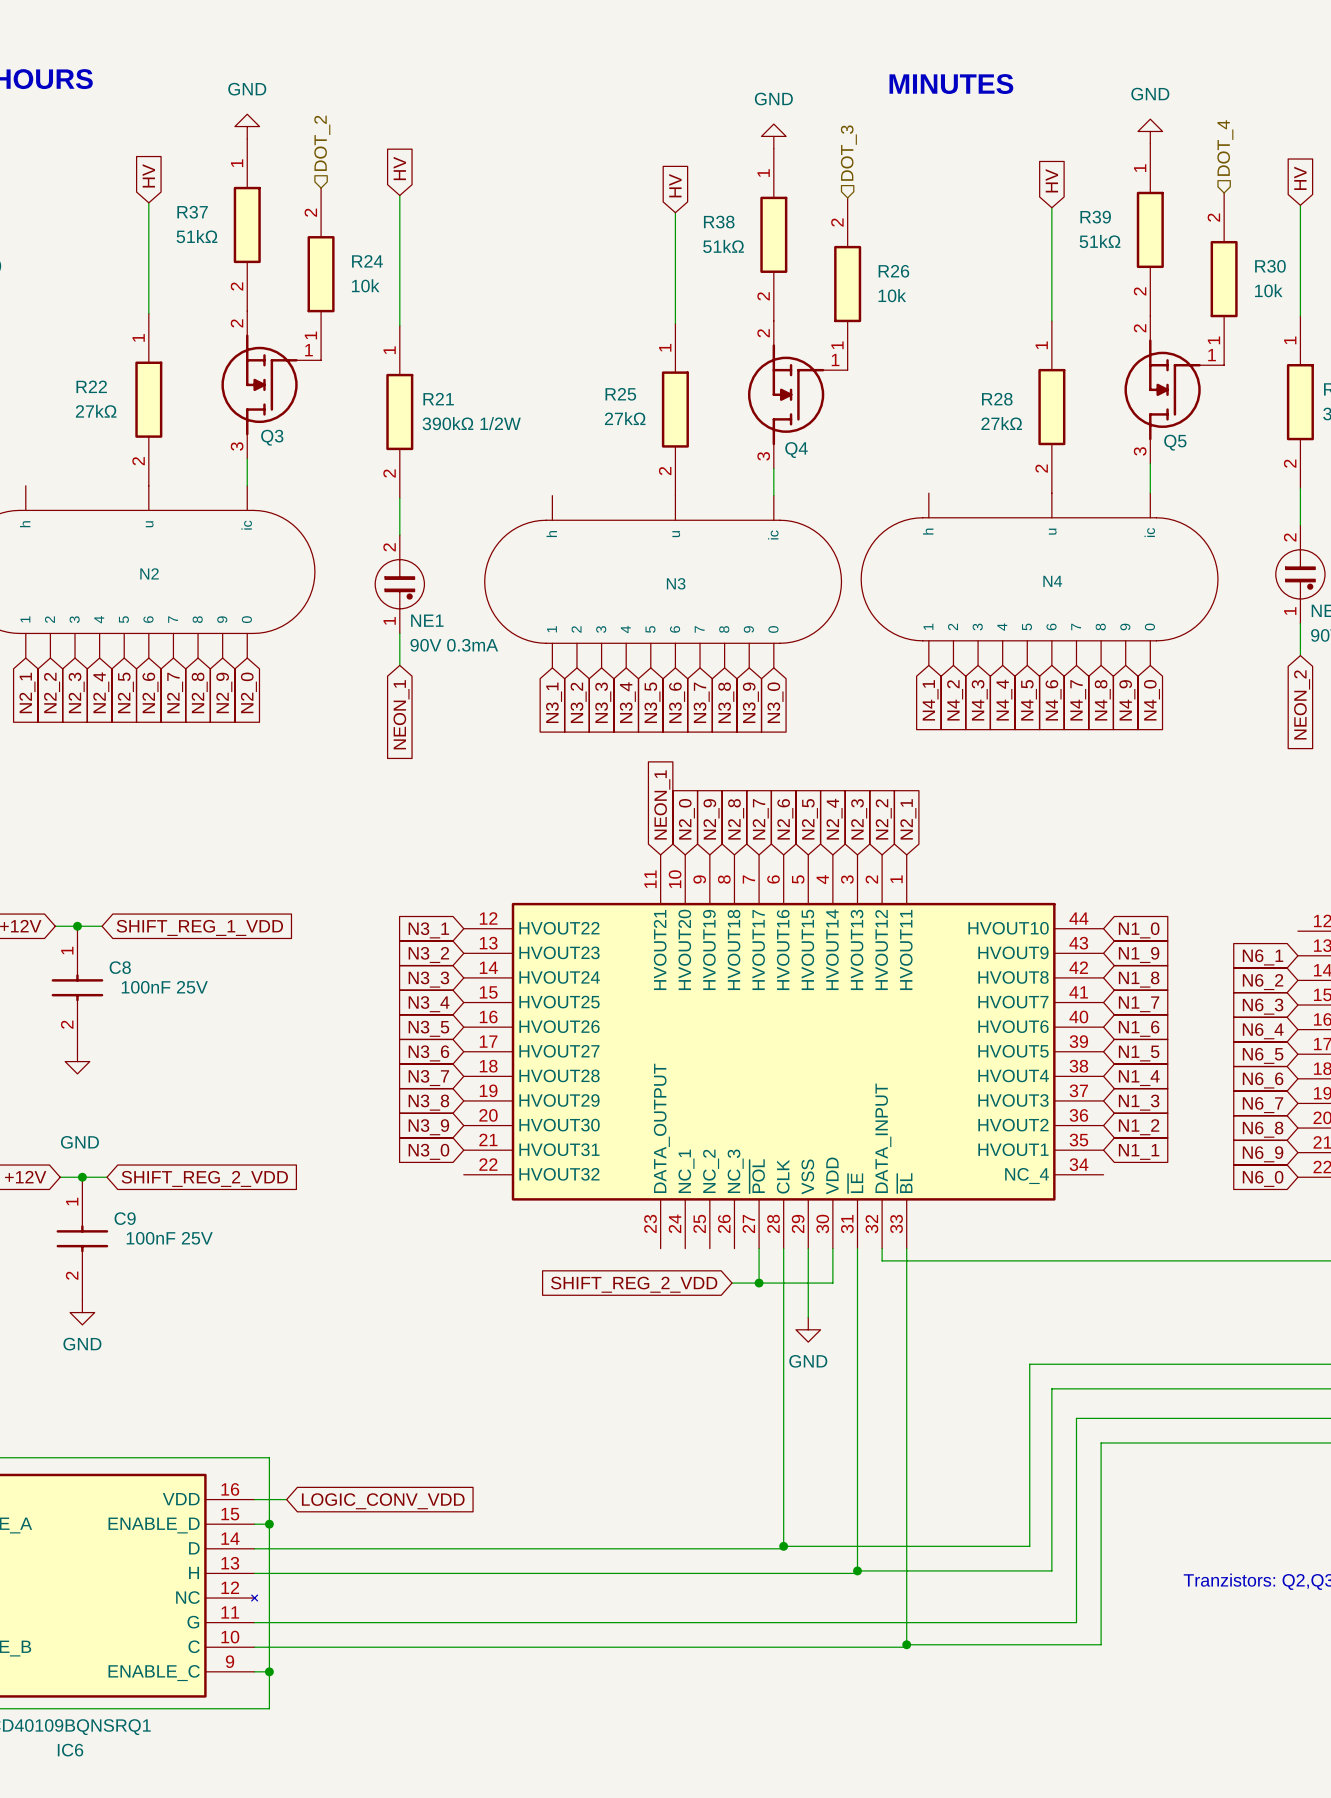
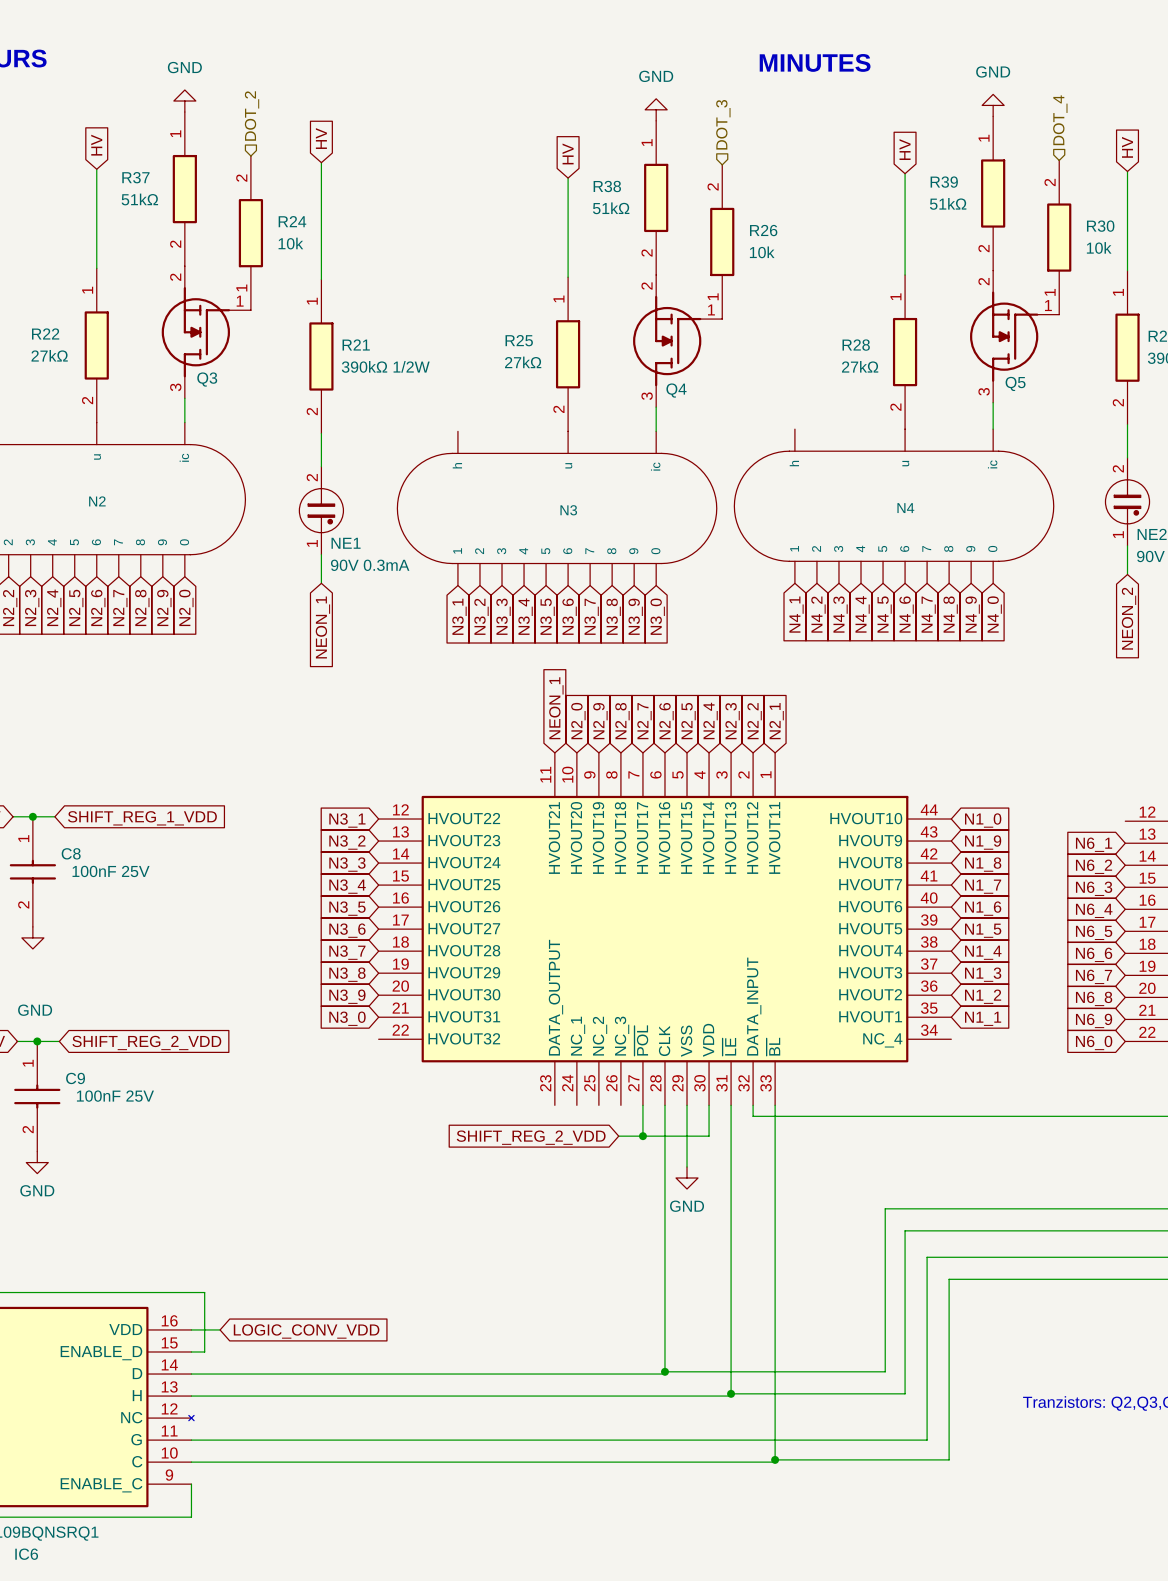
wire: (269, 1524) (269, 1708) (254, 1708) -> none
junction: (269, 1524) -> none
wire: (254, 1671) (269, 1671) -> (191, 1484) (191, 1517)
junction: (269, 1671) -> none

